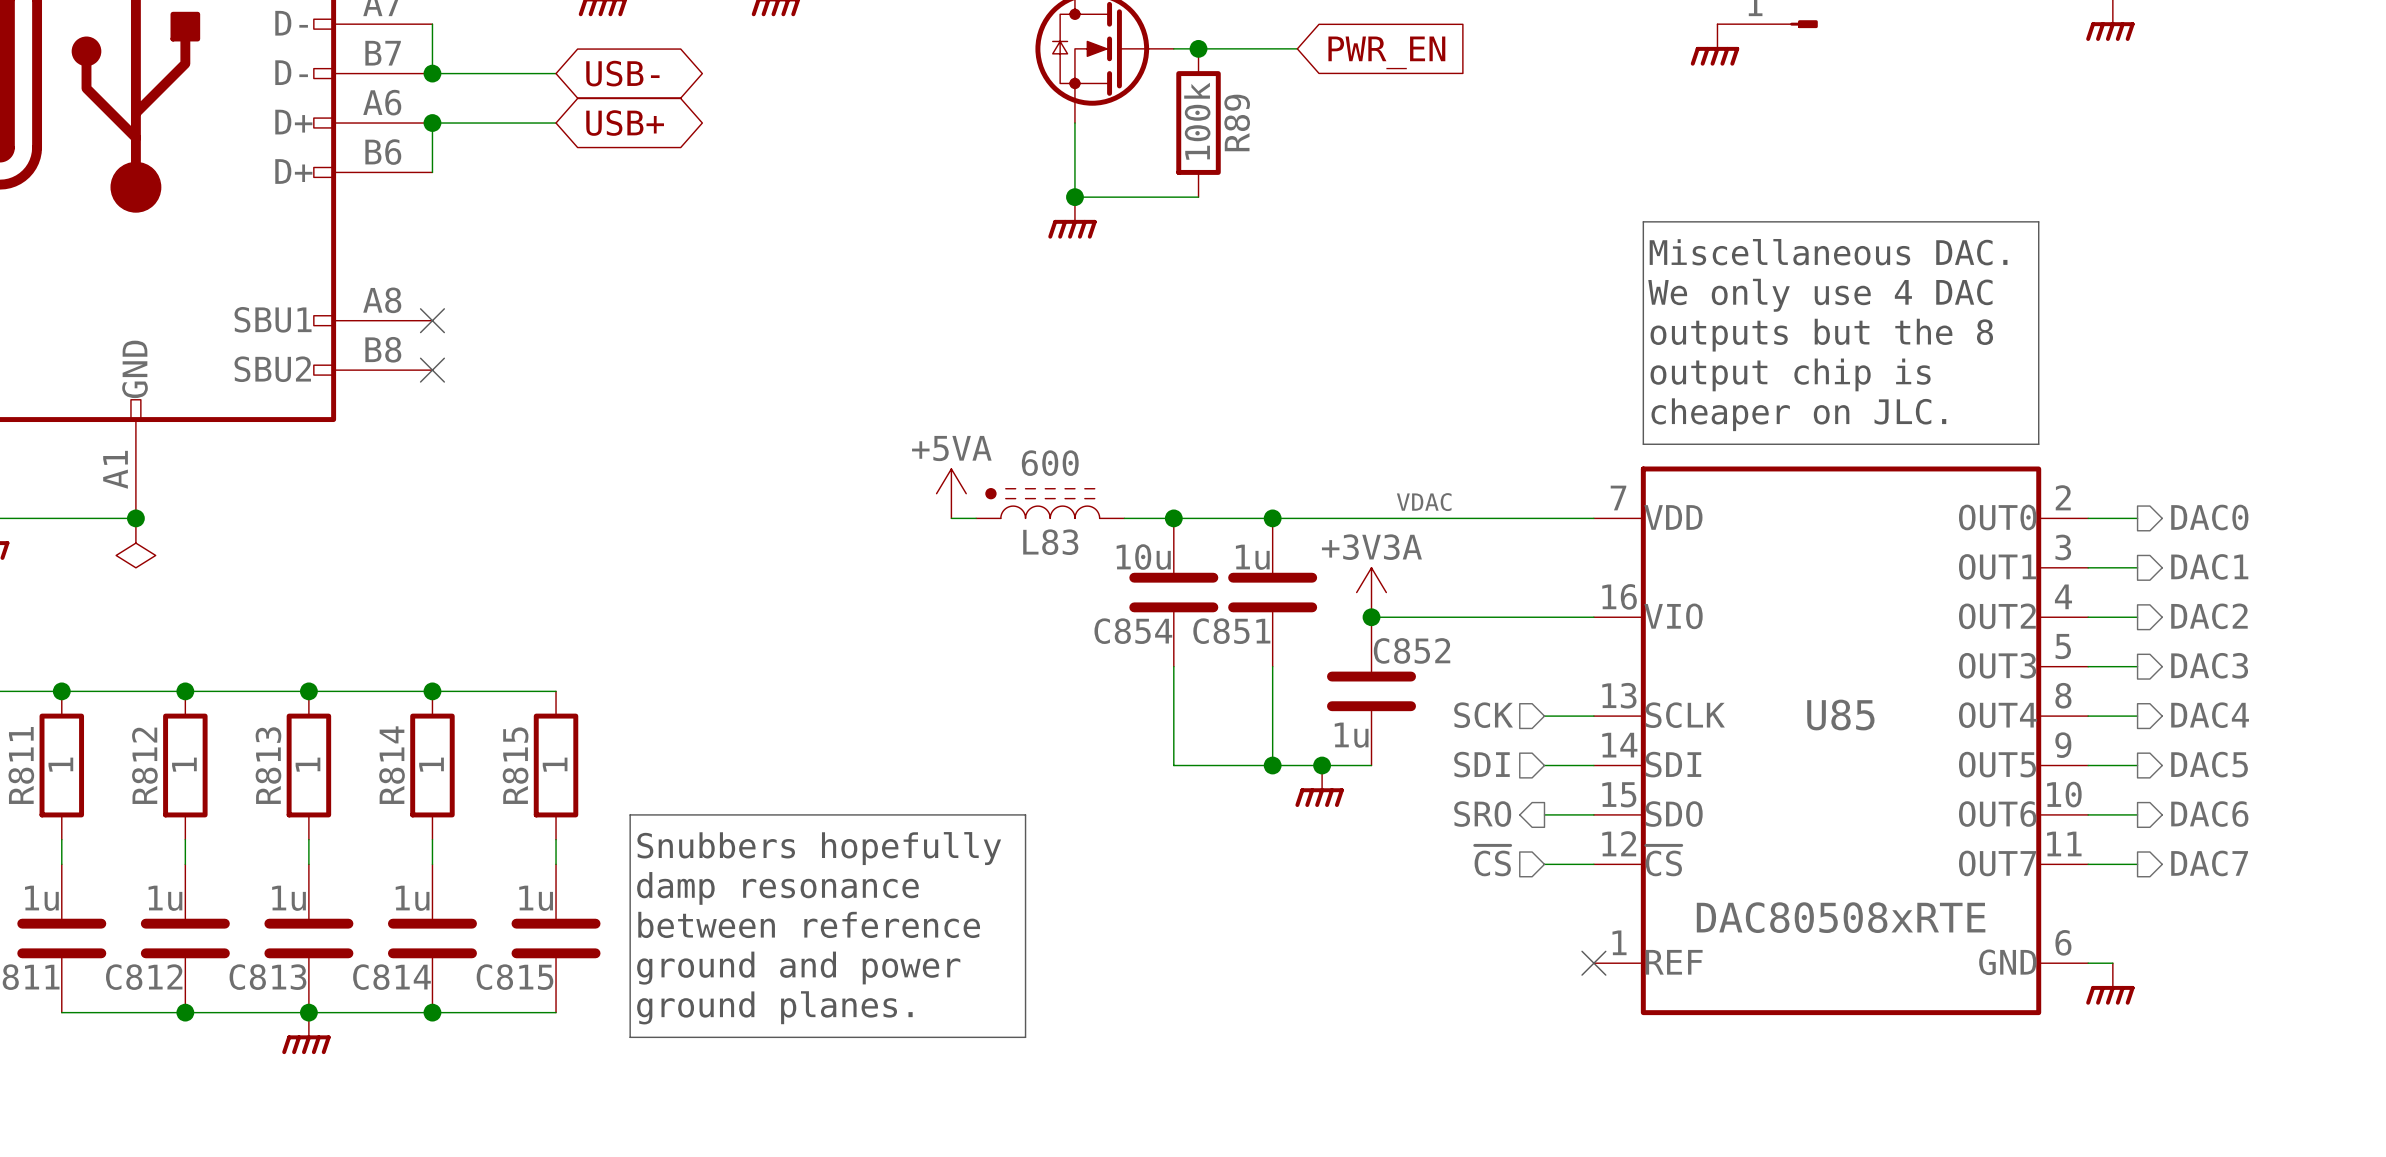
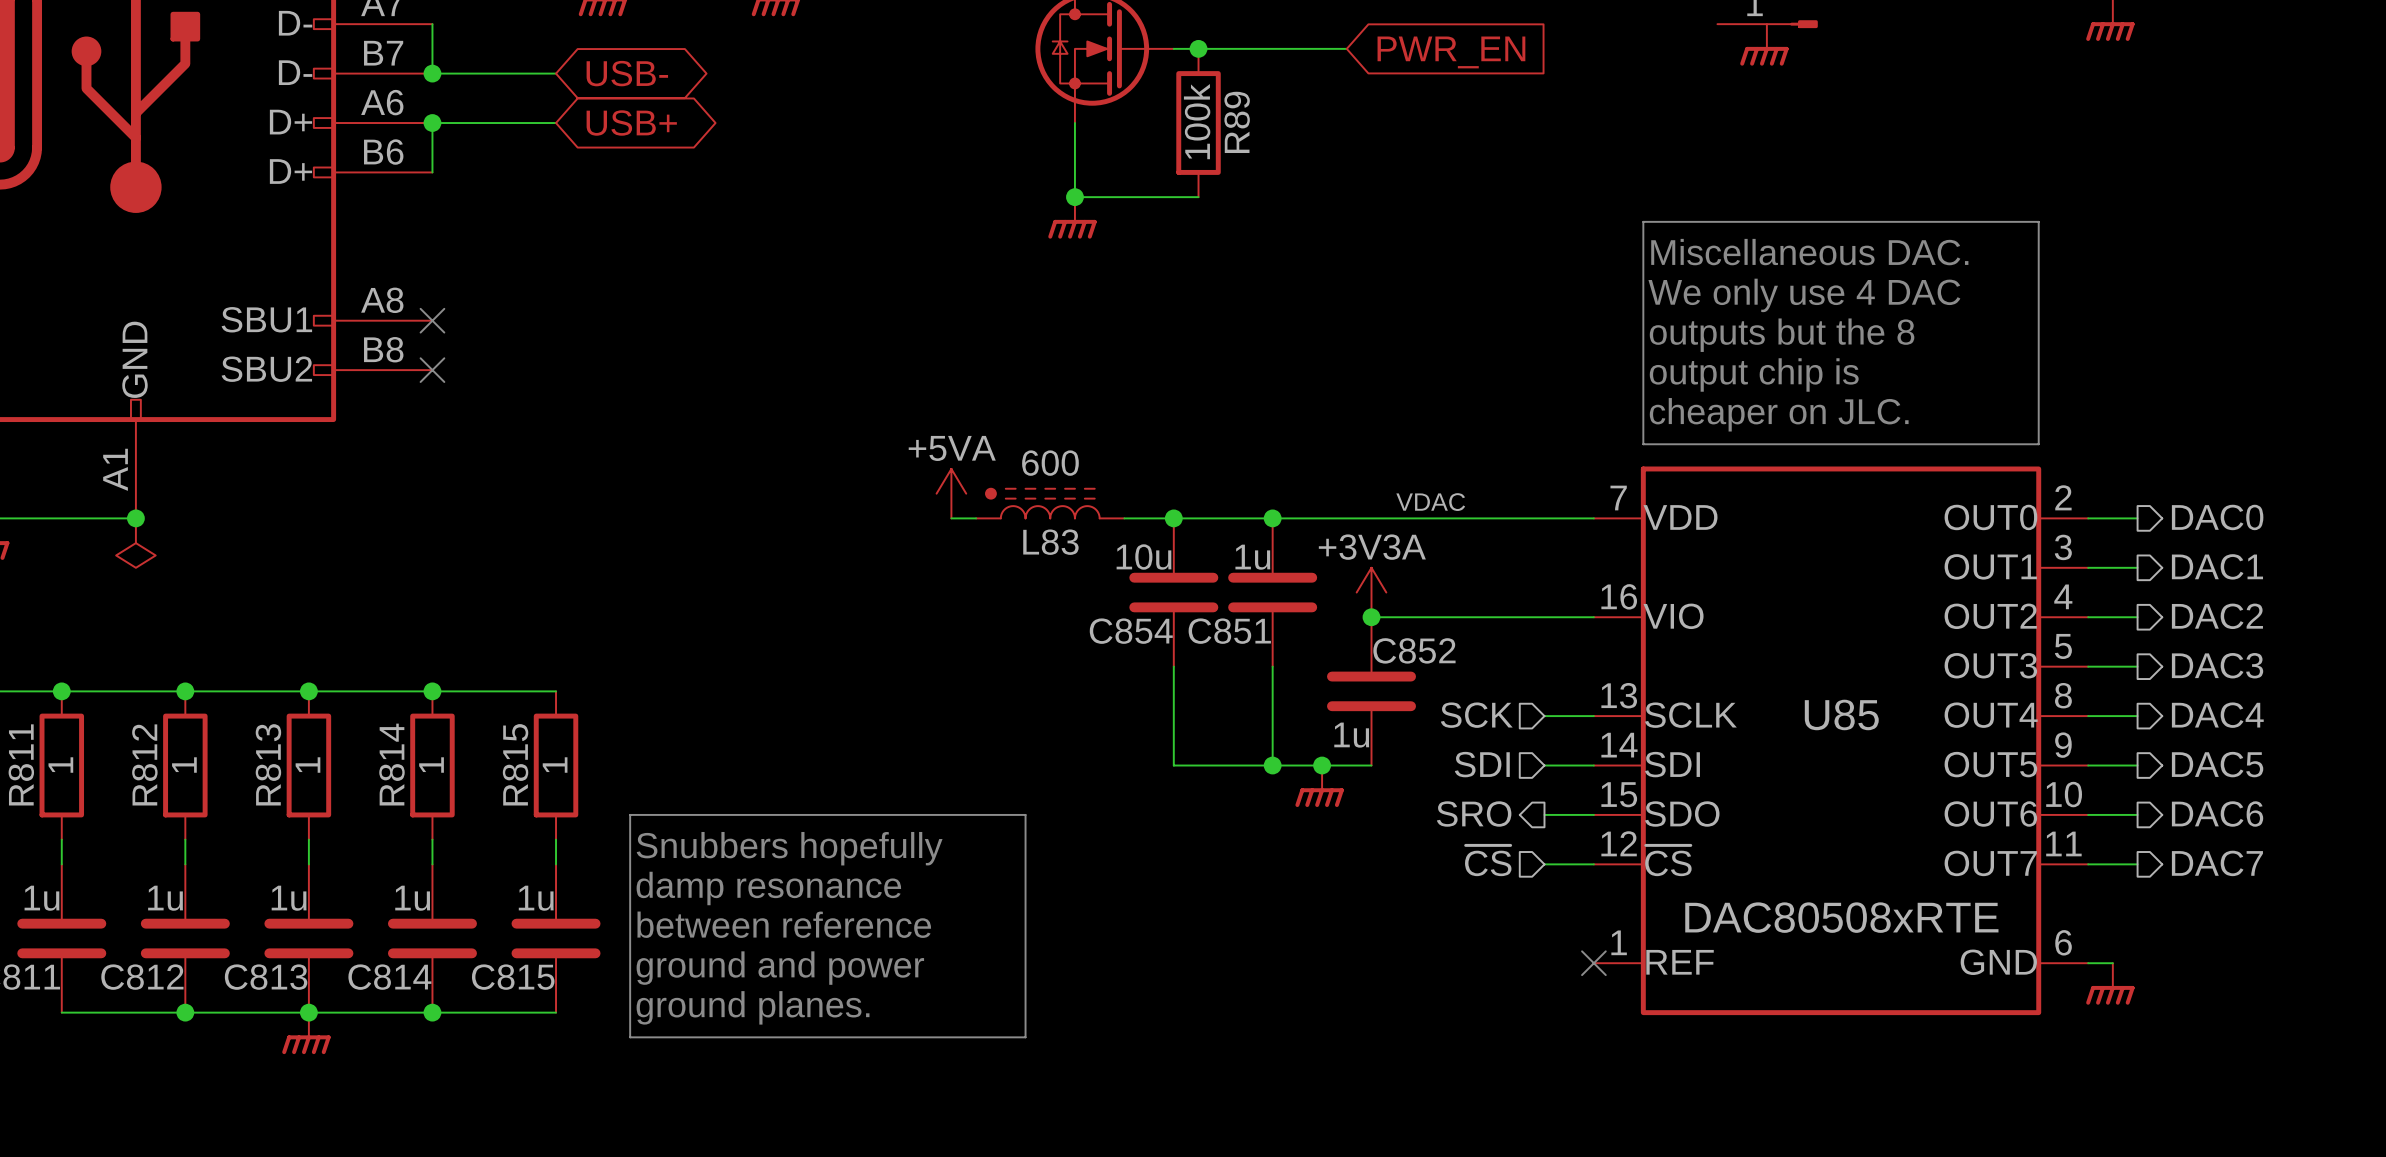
power symbol position: (1715, 44) -> (1764, 44)
wire: none -> (1297, 48) (1346, 48)
global label position: PWR_EN (1386, 52) -> PWR_EN (1451, 52)

